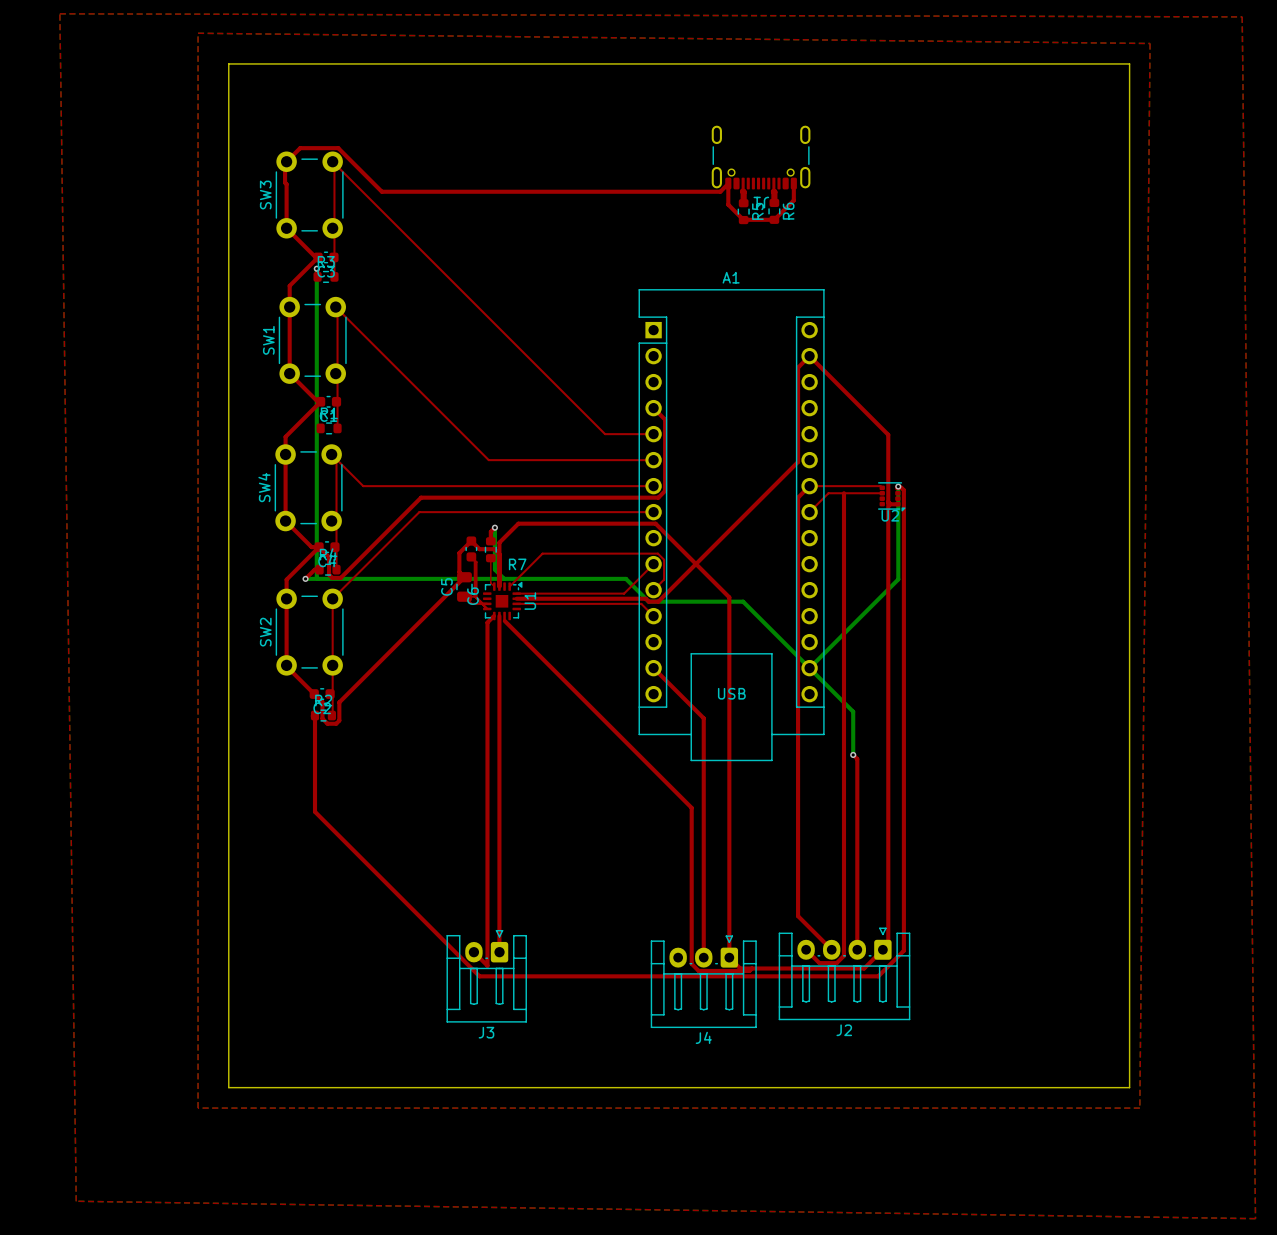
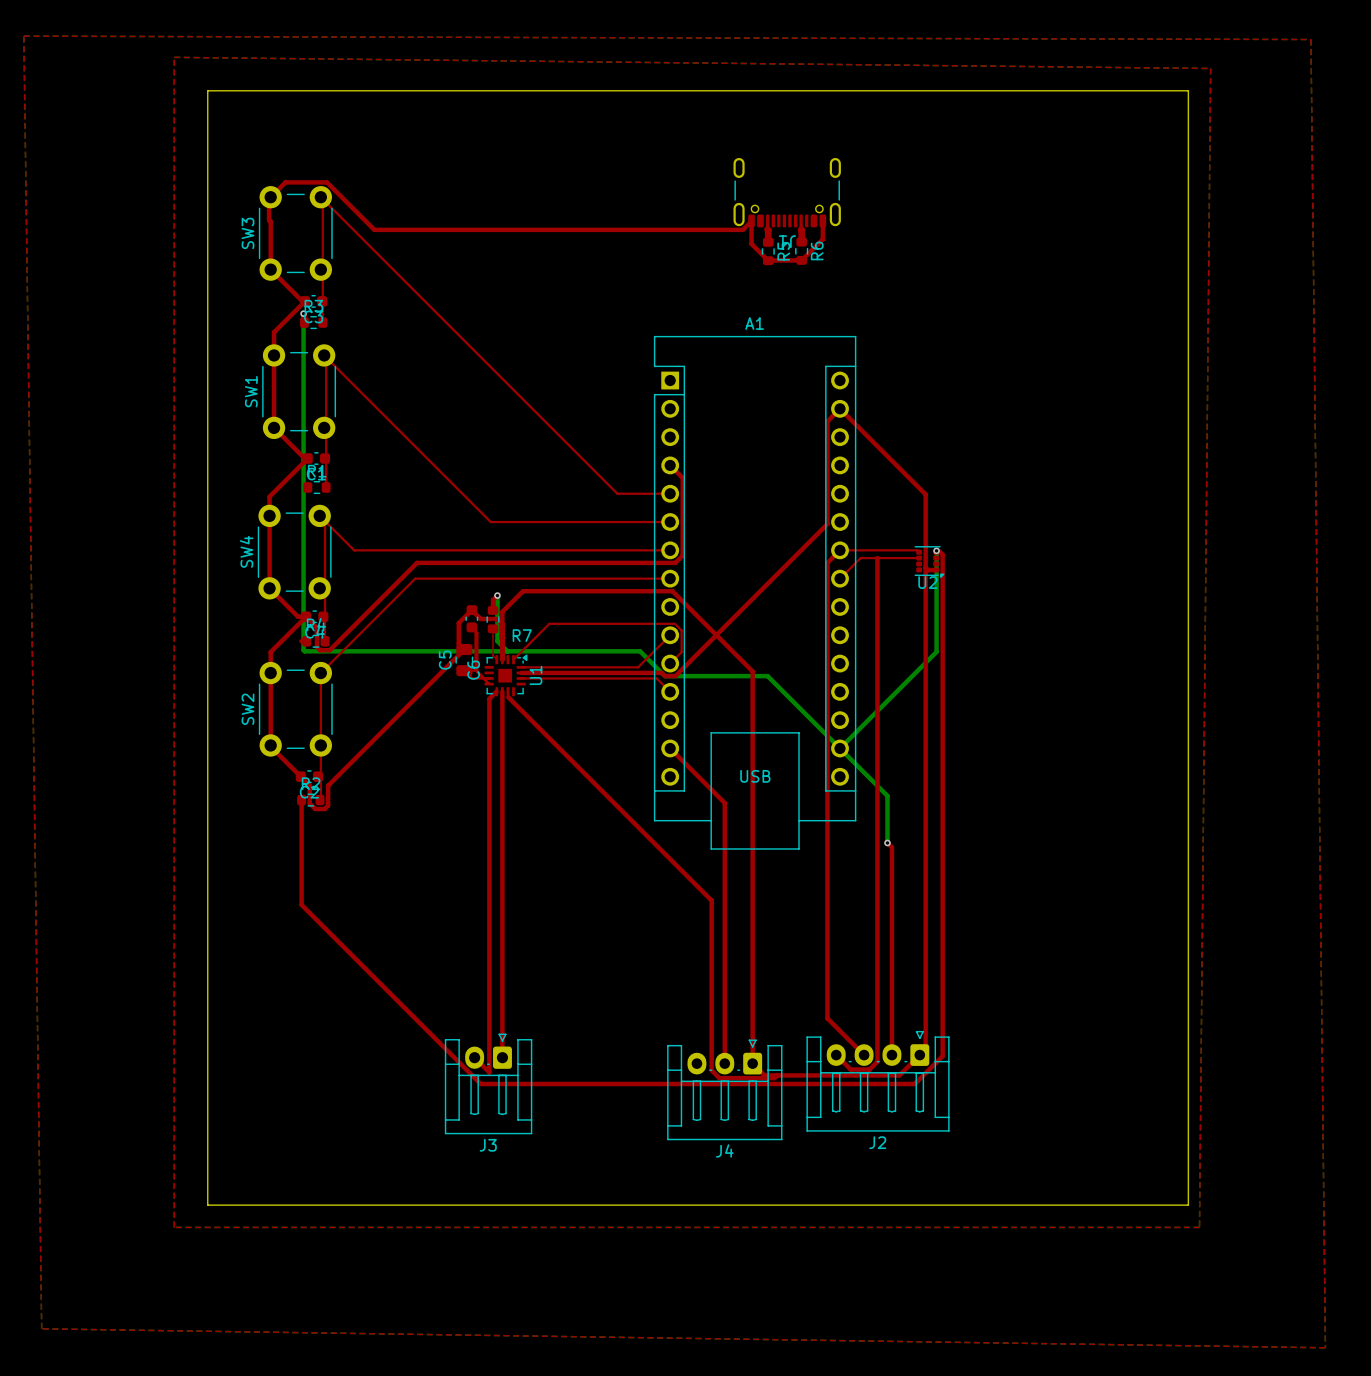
top track: (314, 569) (305, 578) -> none
bottom track: (305, 578) (317, 578) -> none
via: (305, 578) -> none

